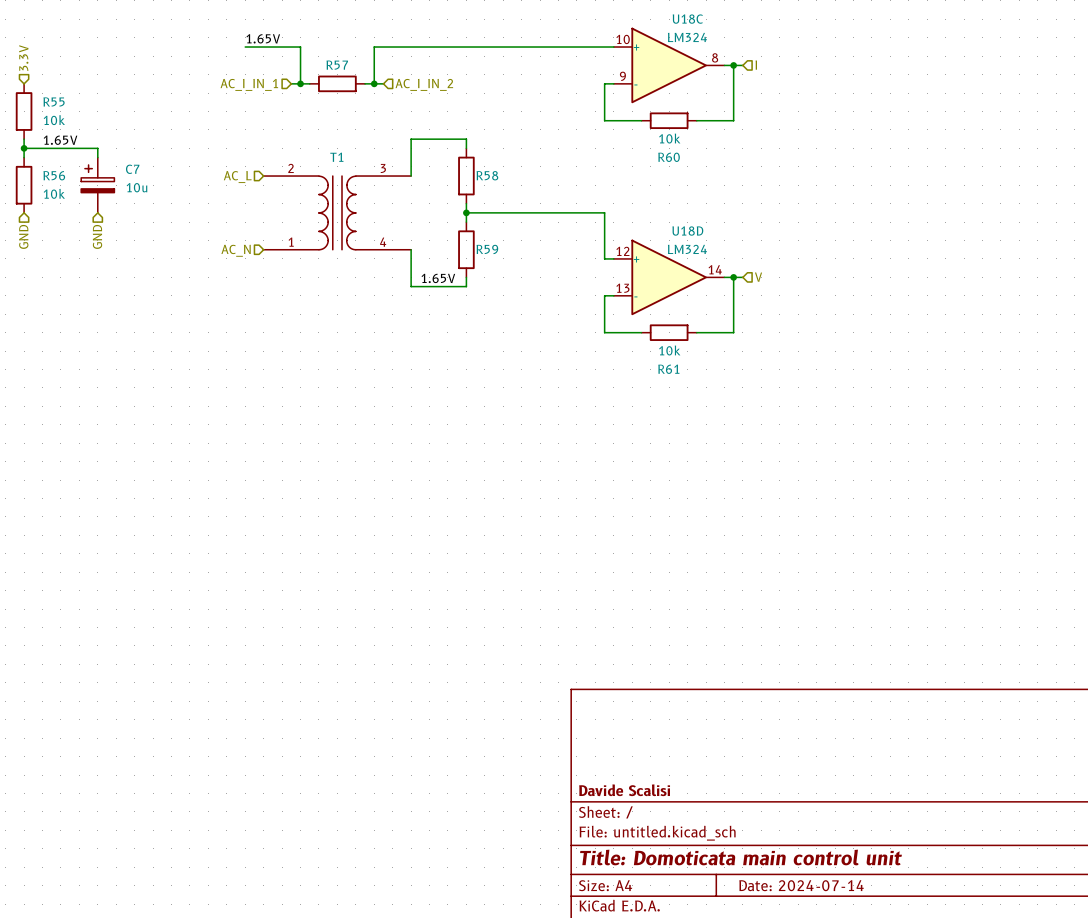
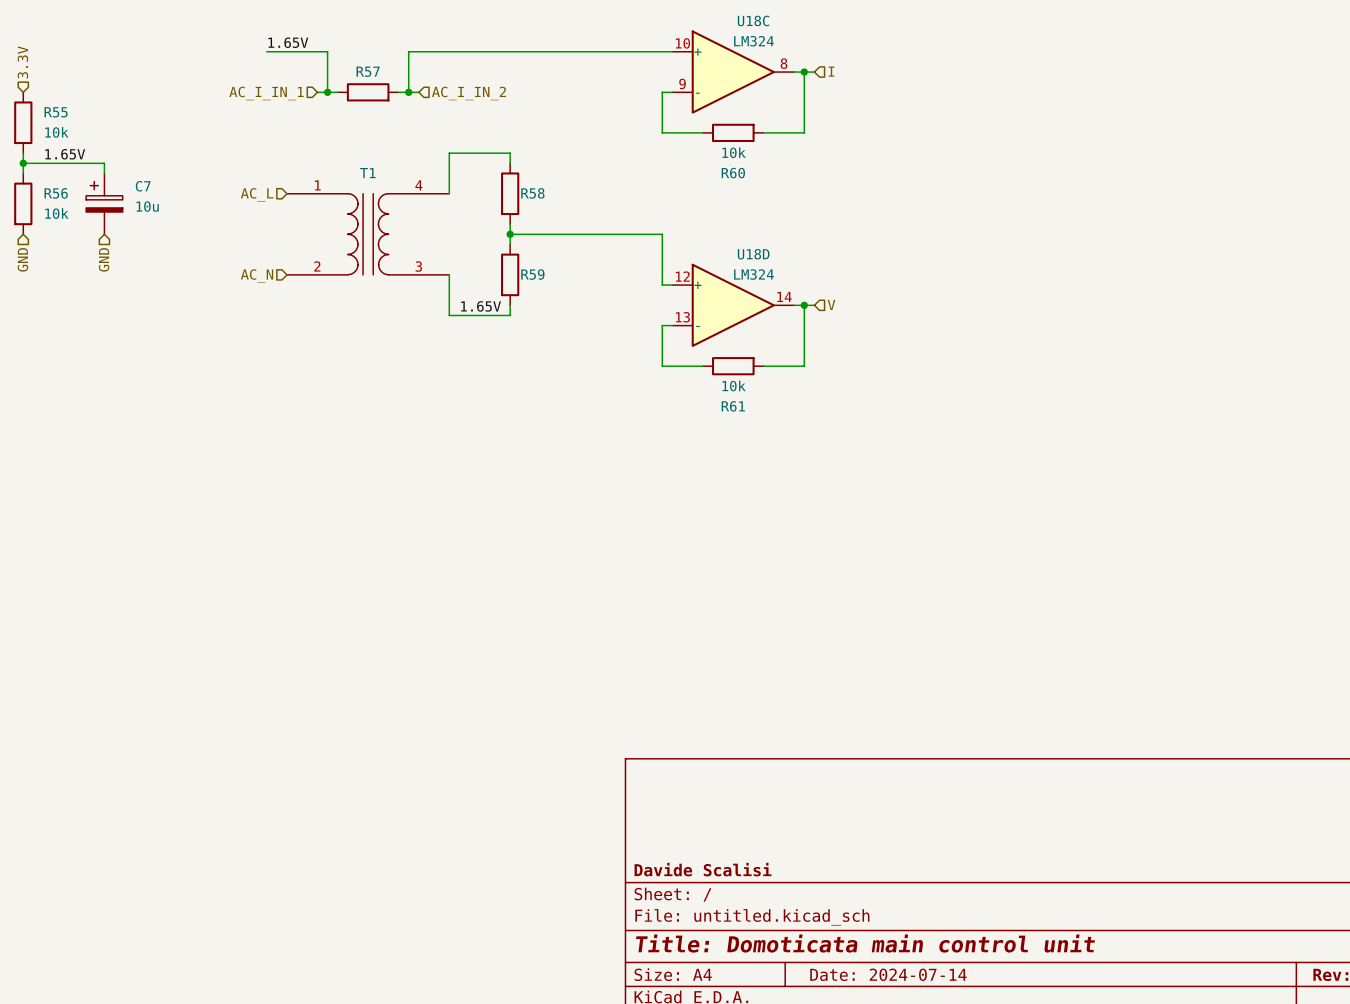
T1 flip: as is (337, 212) -> up-down (368, 234)

